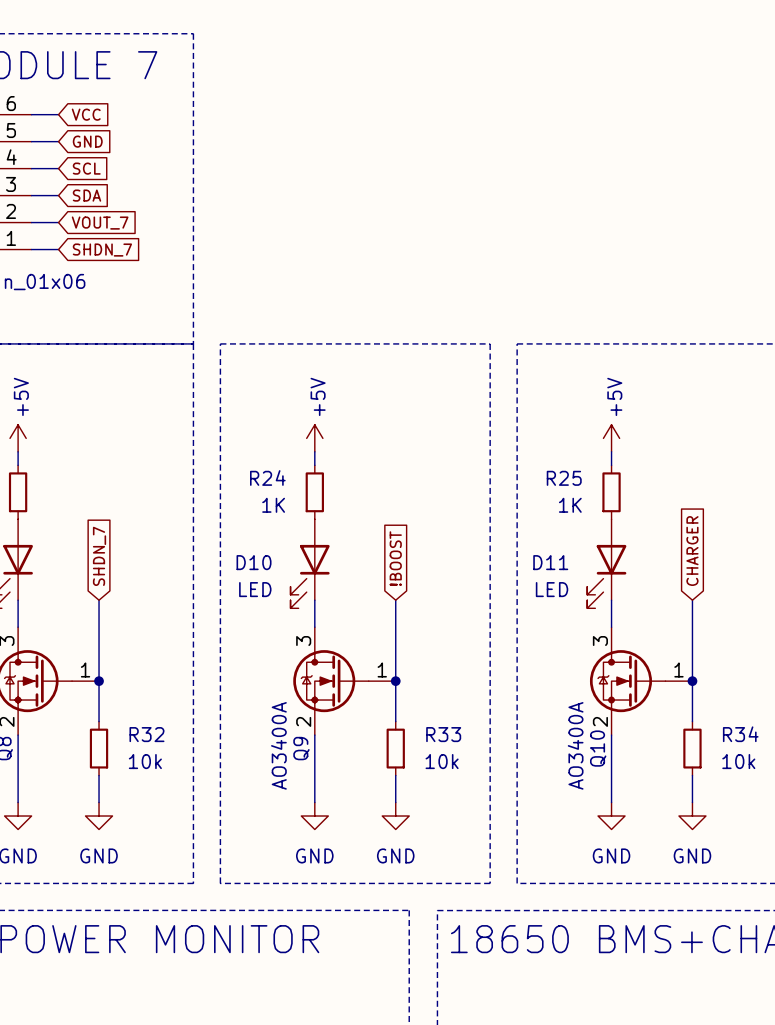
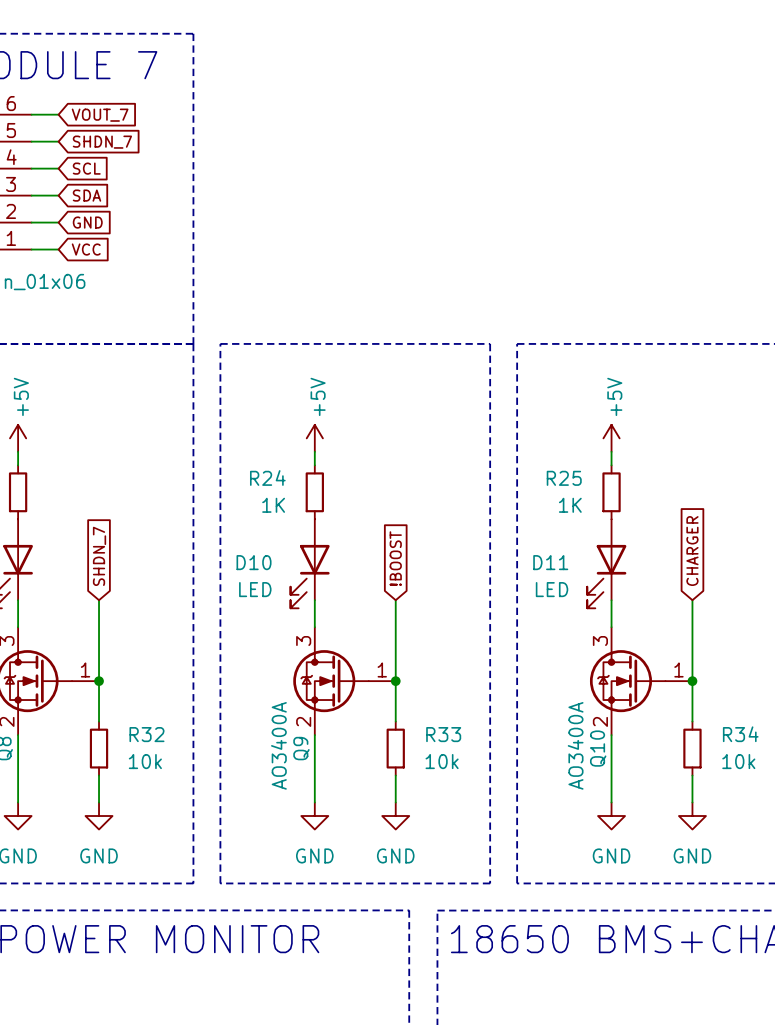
global label: VCC (86, 114) -> VOUT_7 (100, 115)
global label: GND (87, 141) -> SHDN_7 (102, 142)
global label: VOUT_7 (100, 223) -> GND (87, 222)
global label: SHDN_7 (102, 250) -> VCC (86, 249)

